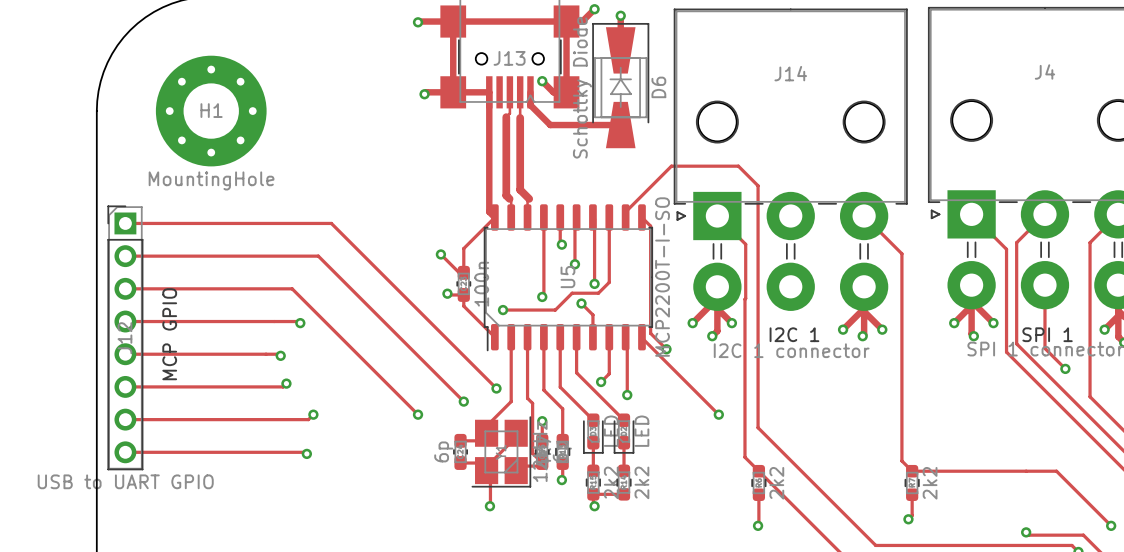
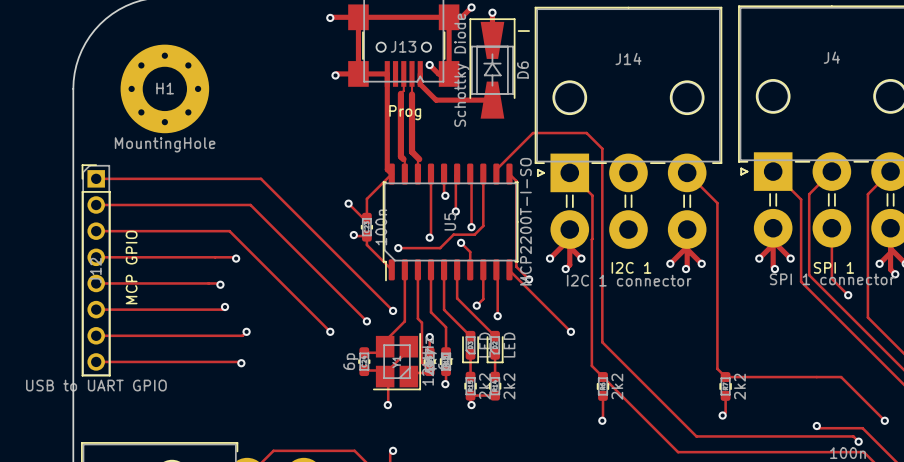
line: none -> (518, 31) (529, 31)
text: none -> Prog (405, 112)

